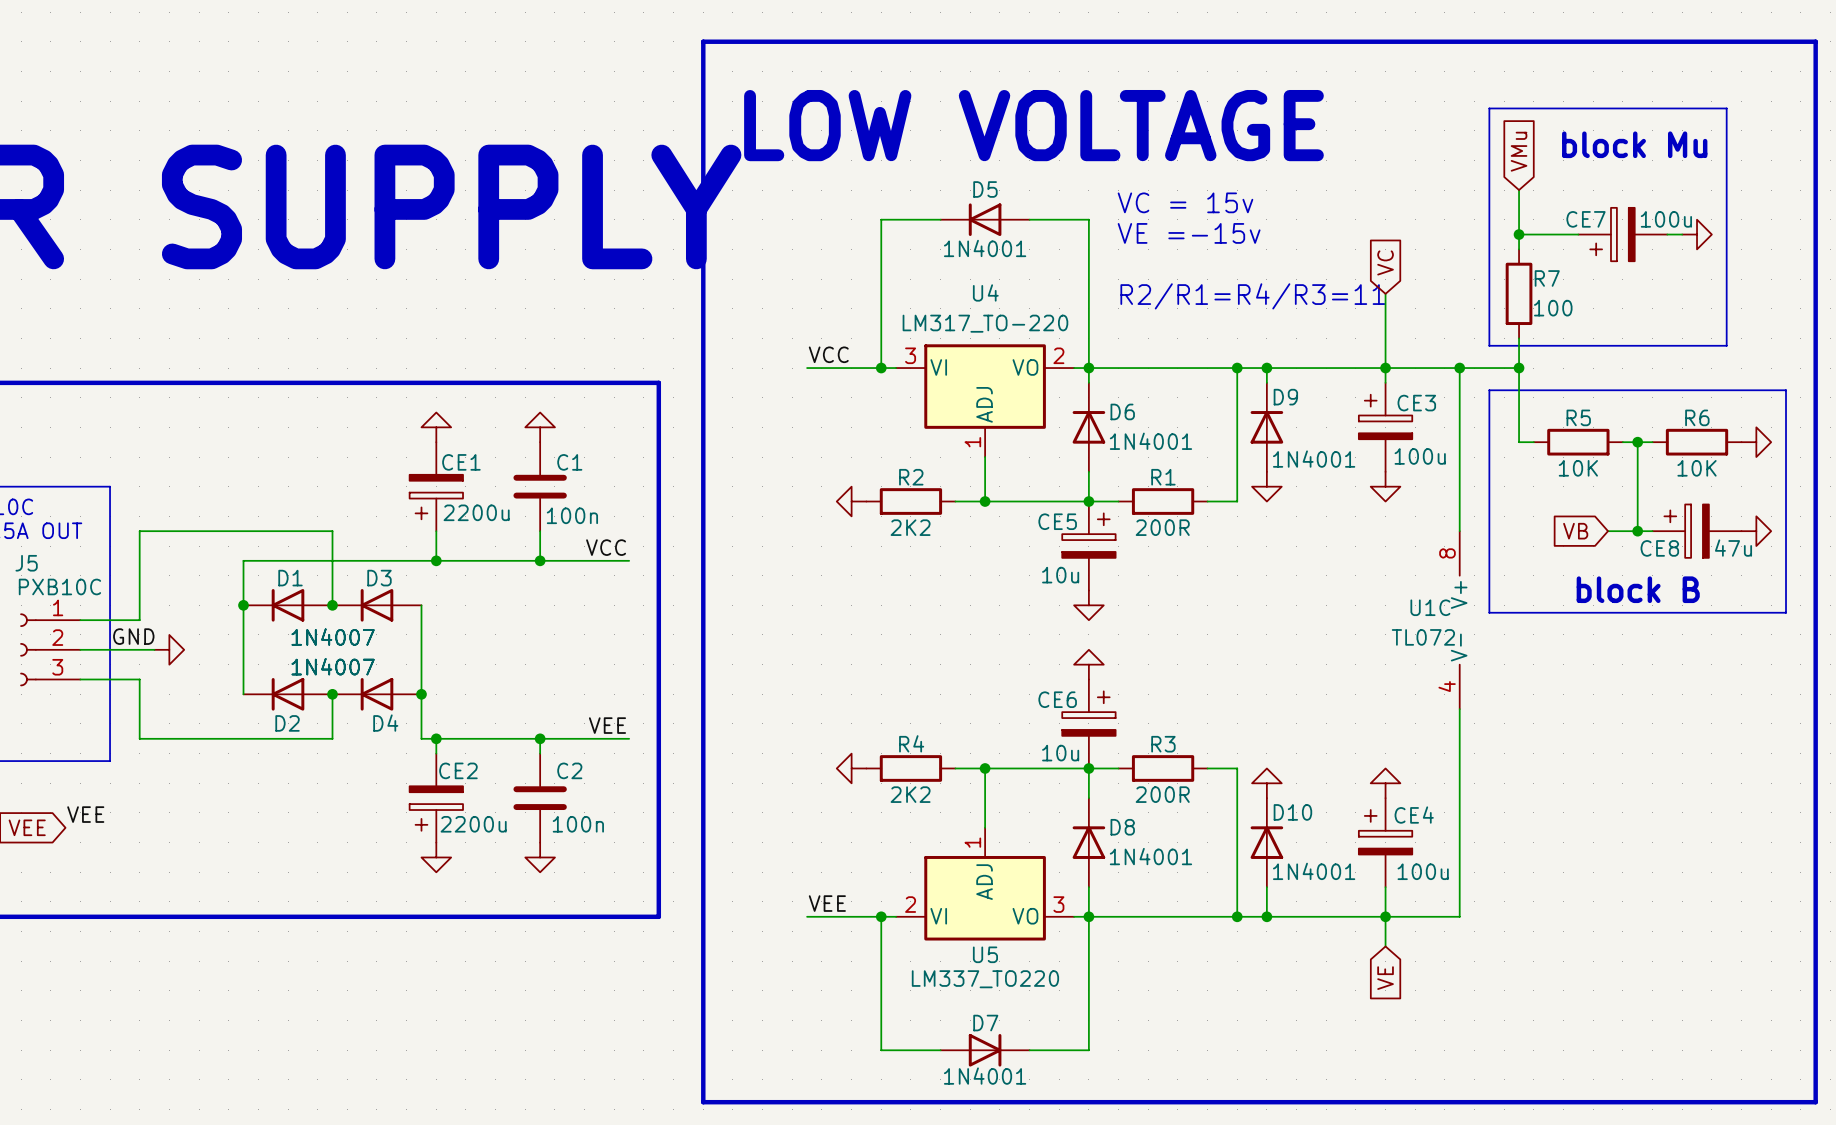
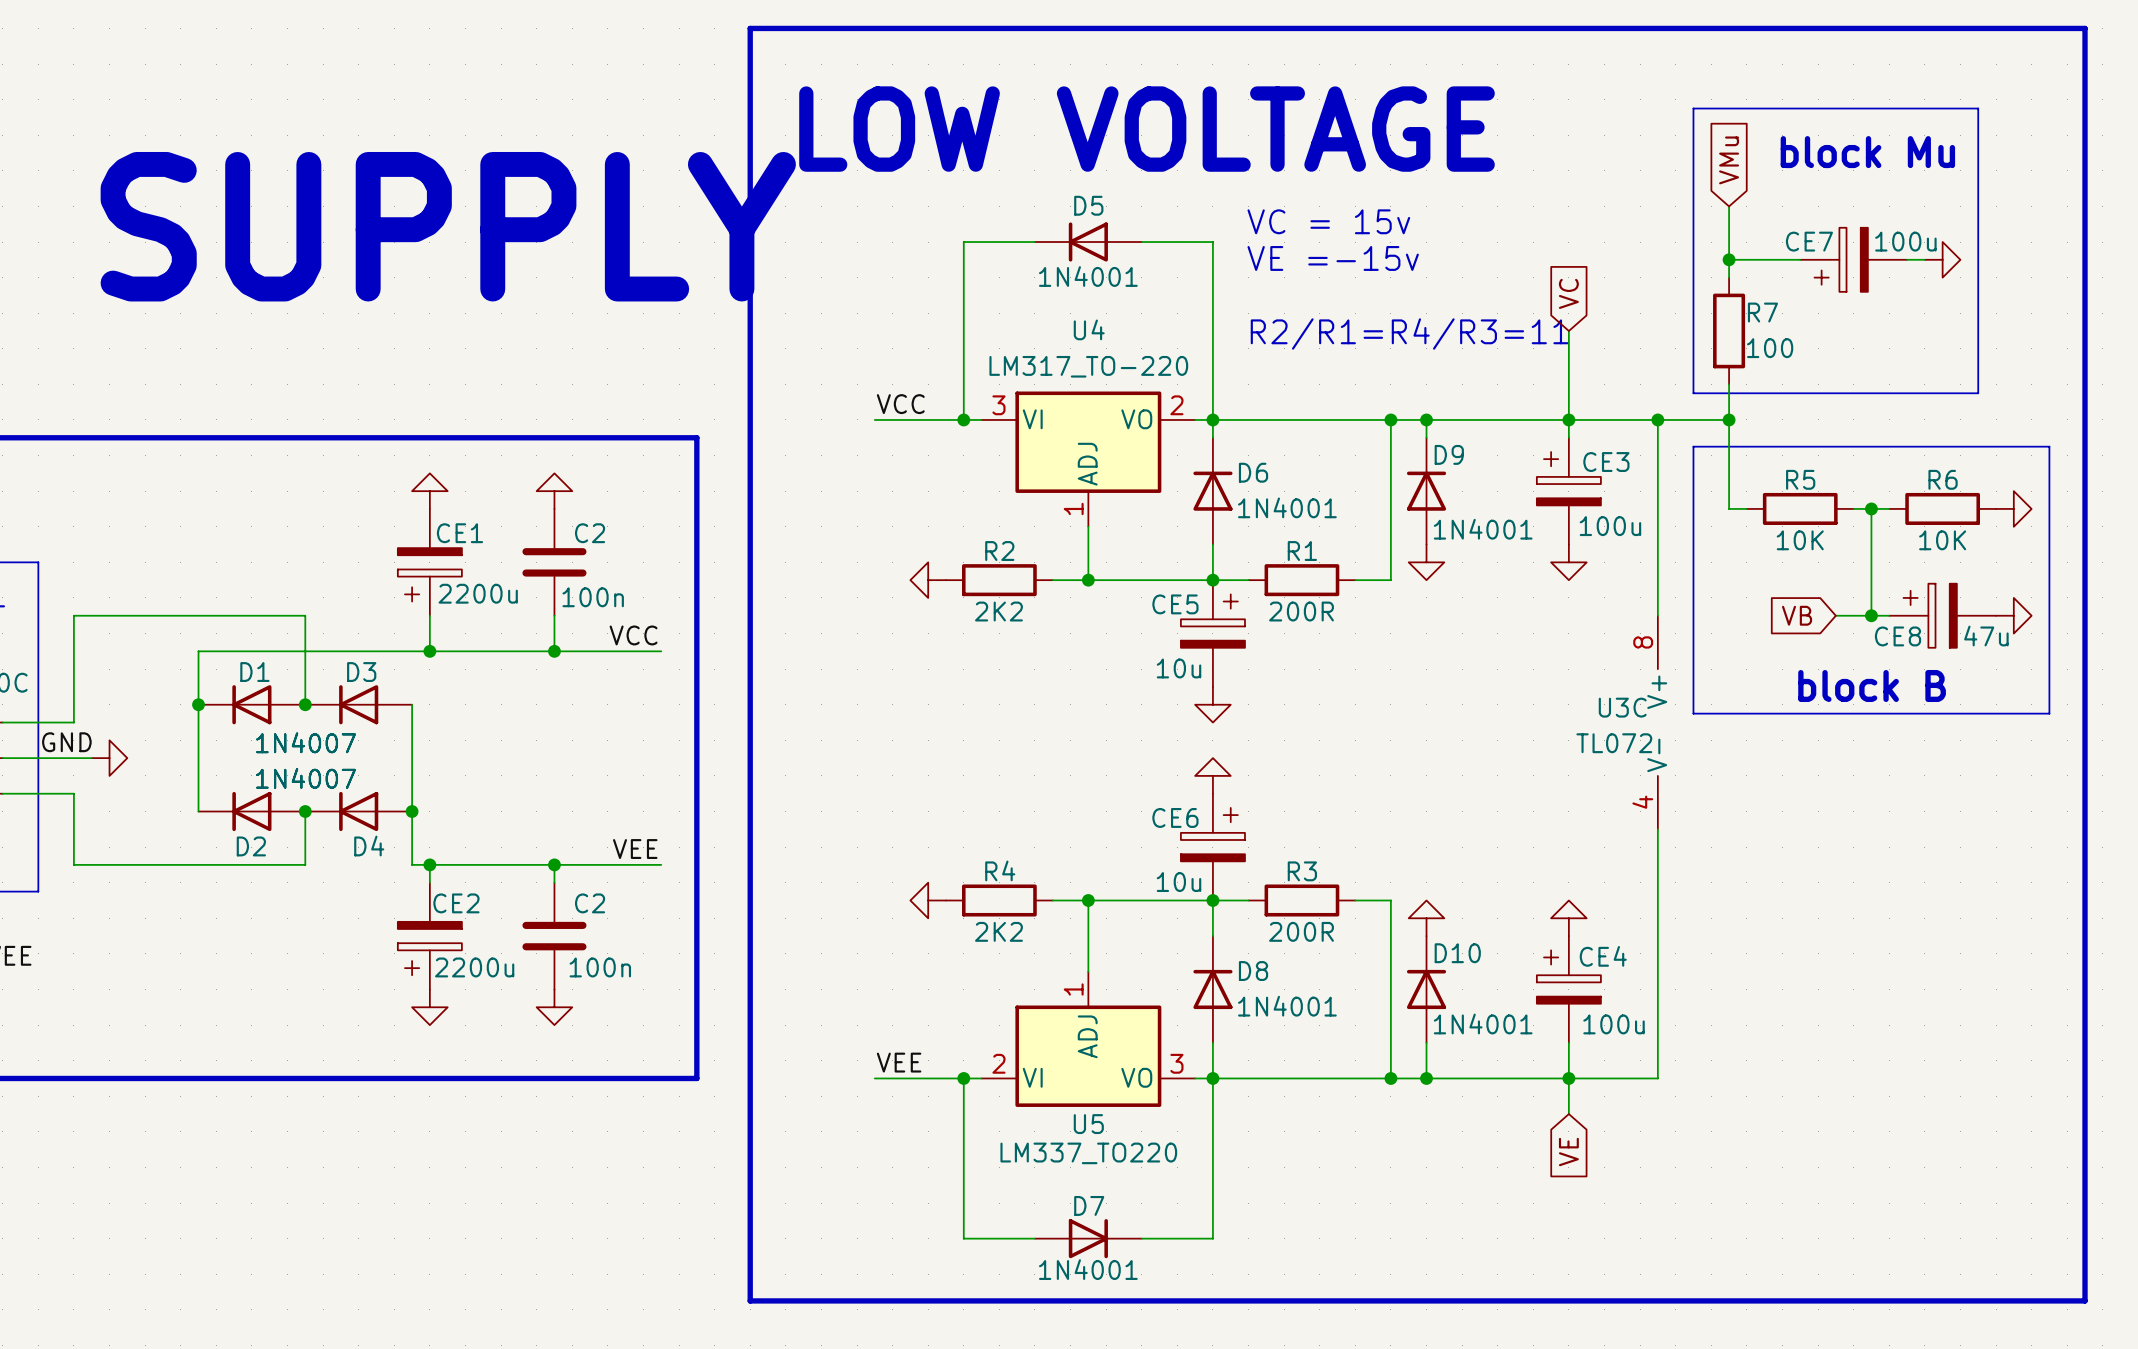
C1 name: C1 (569, 462) -> C2 (590, 533)
U1C name: U1C (1430, 607) -> U3C (1622, 707)

